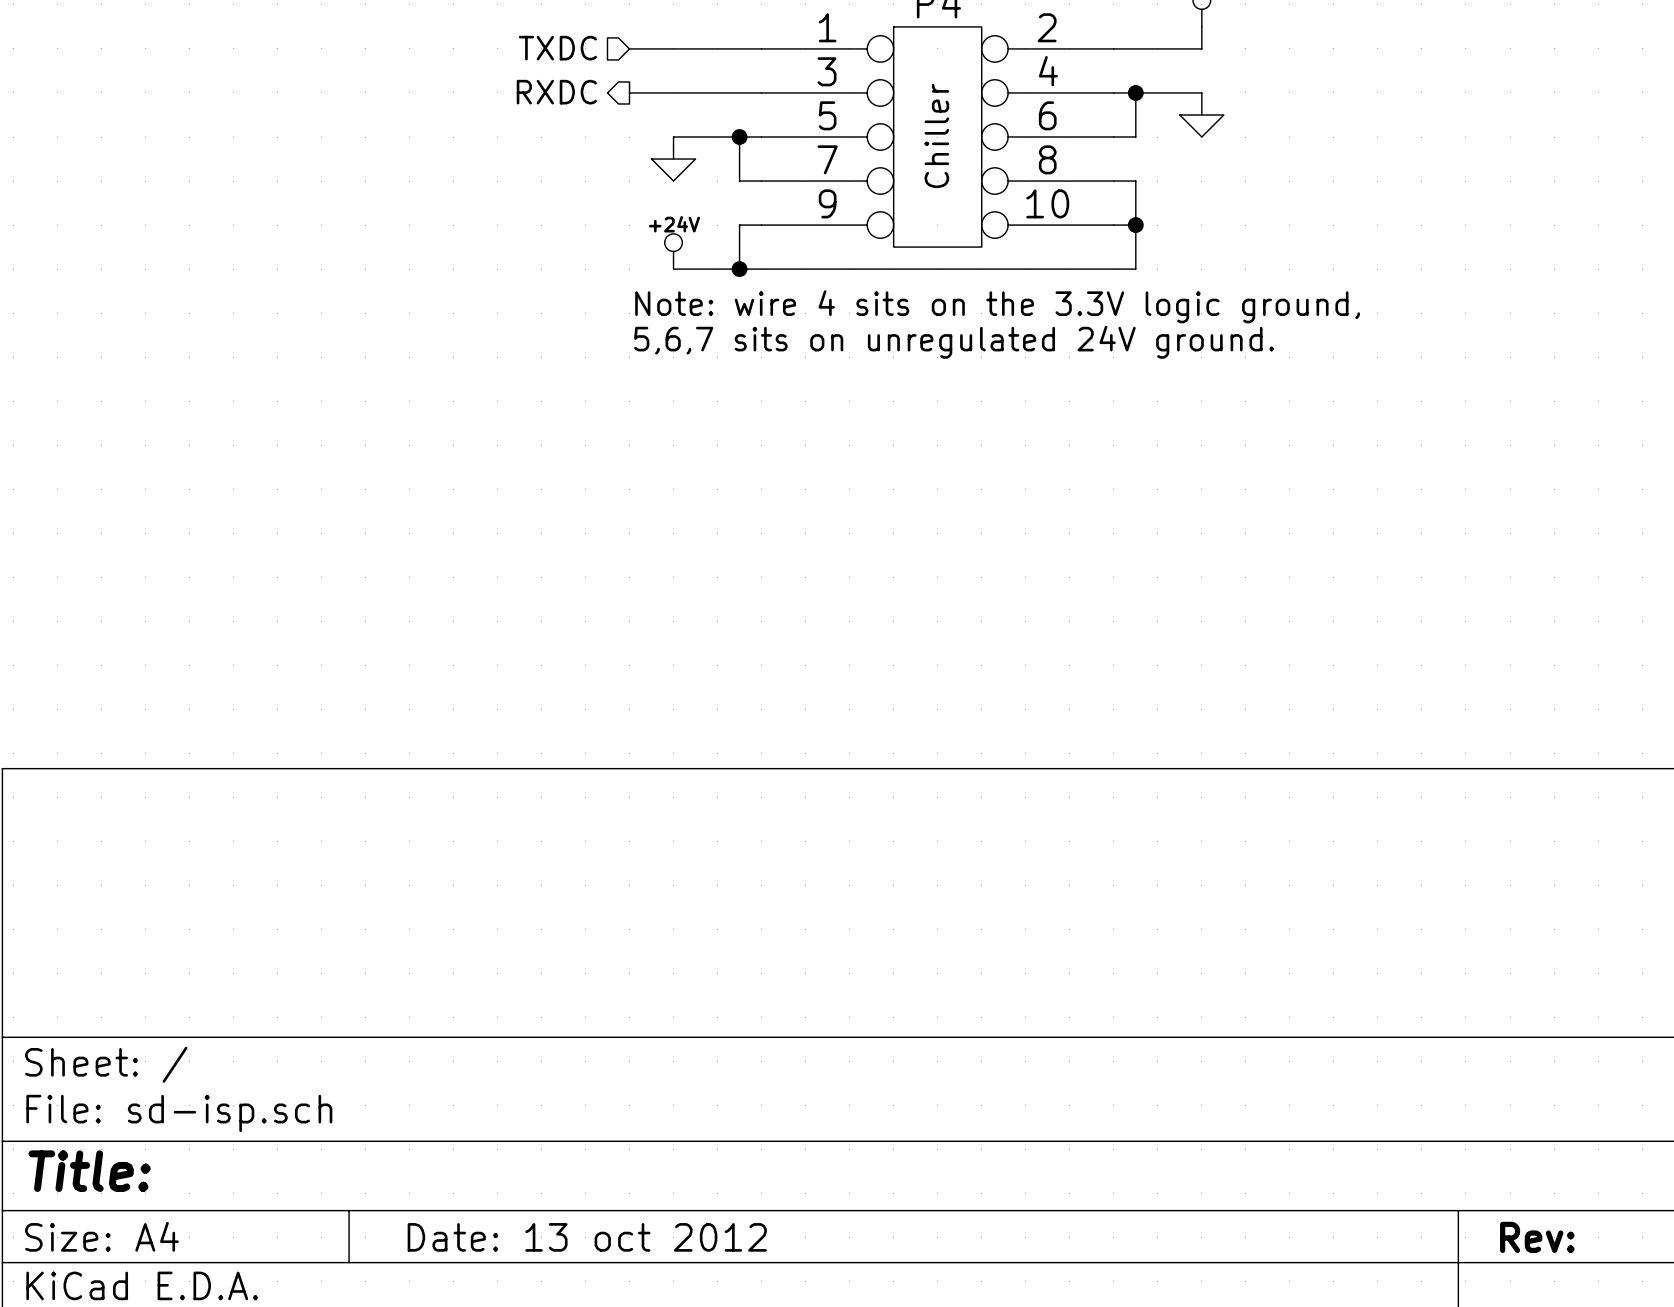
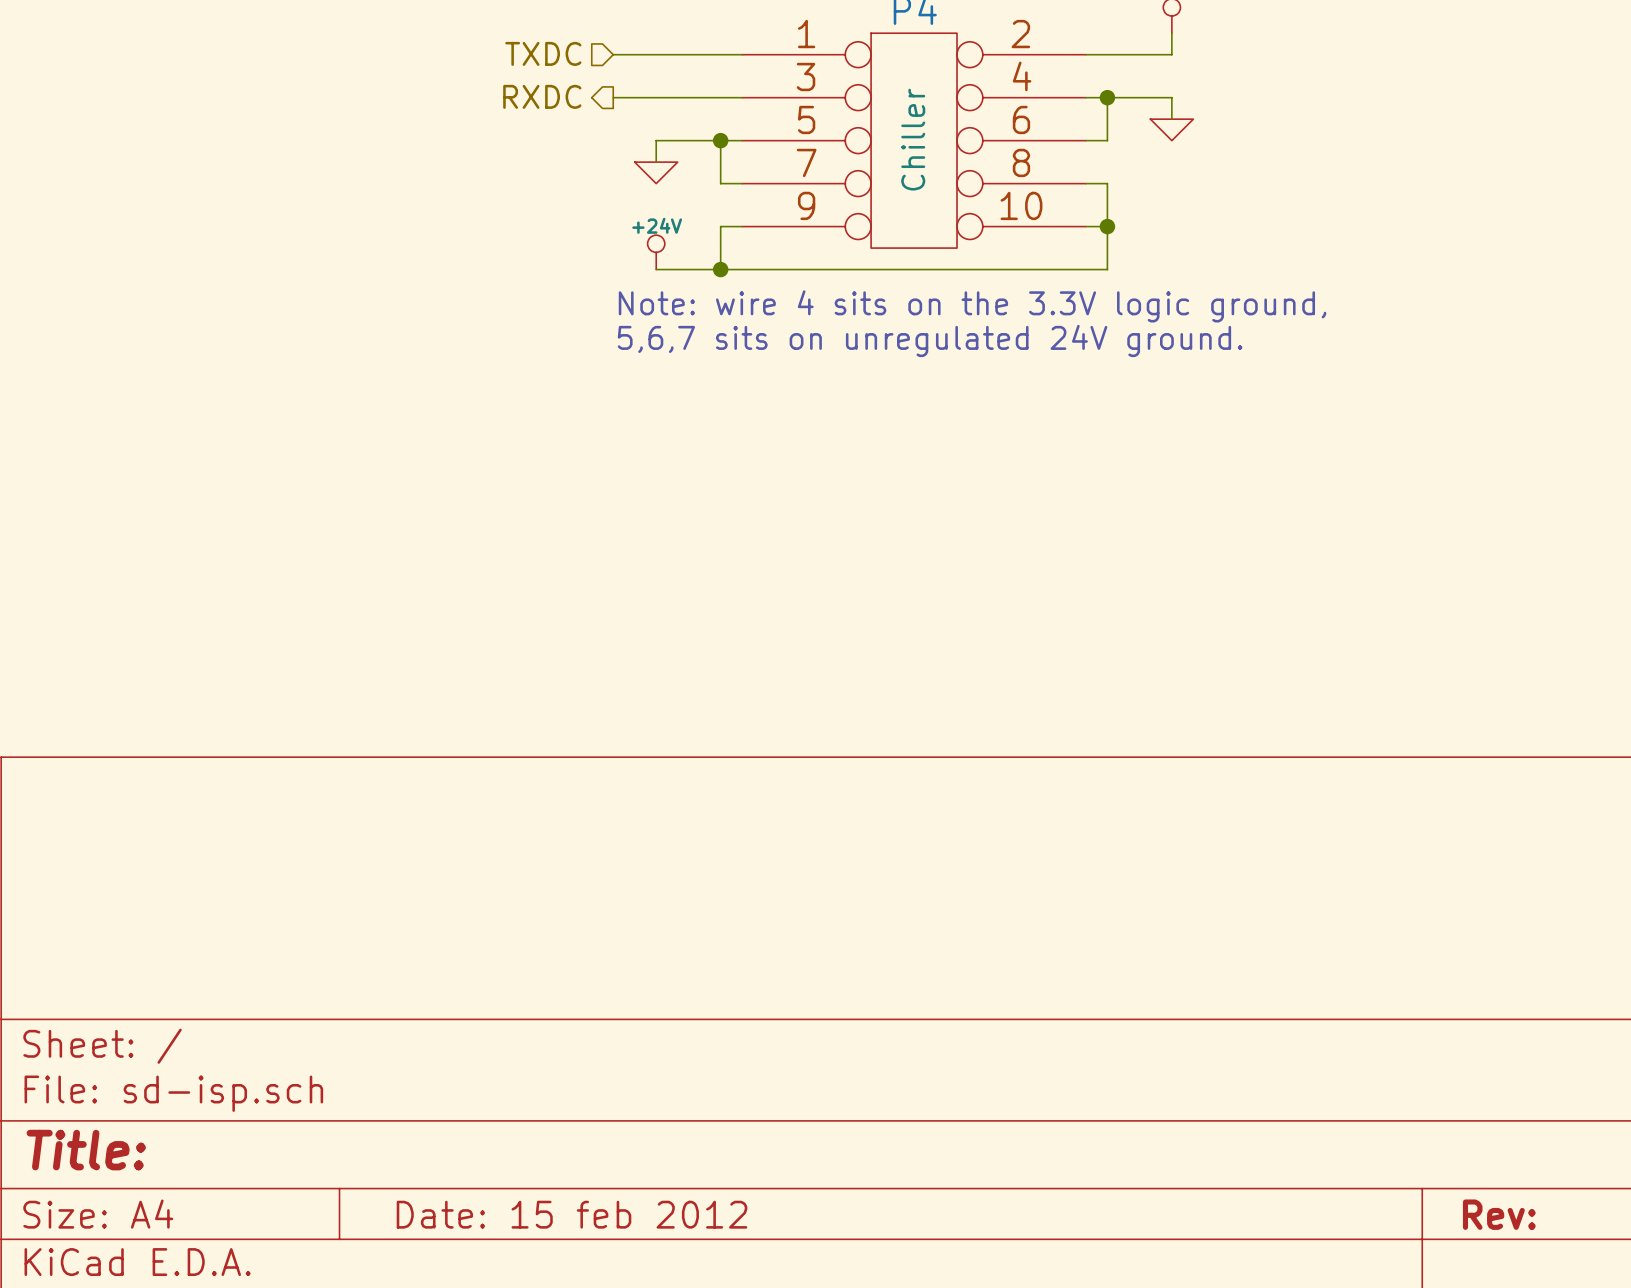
title block: Date: 13 oct 2012 (587, 1237) -> Date: 15 feb 2012 (572, 1214)

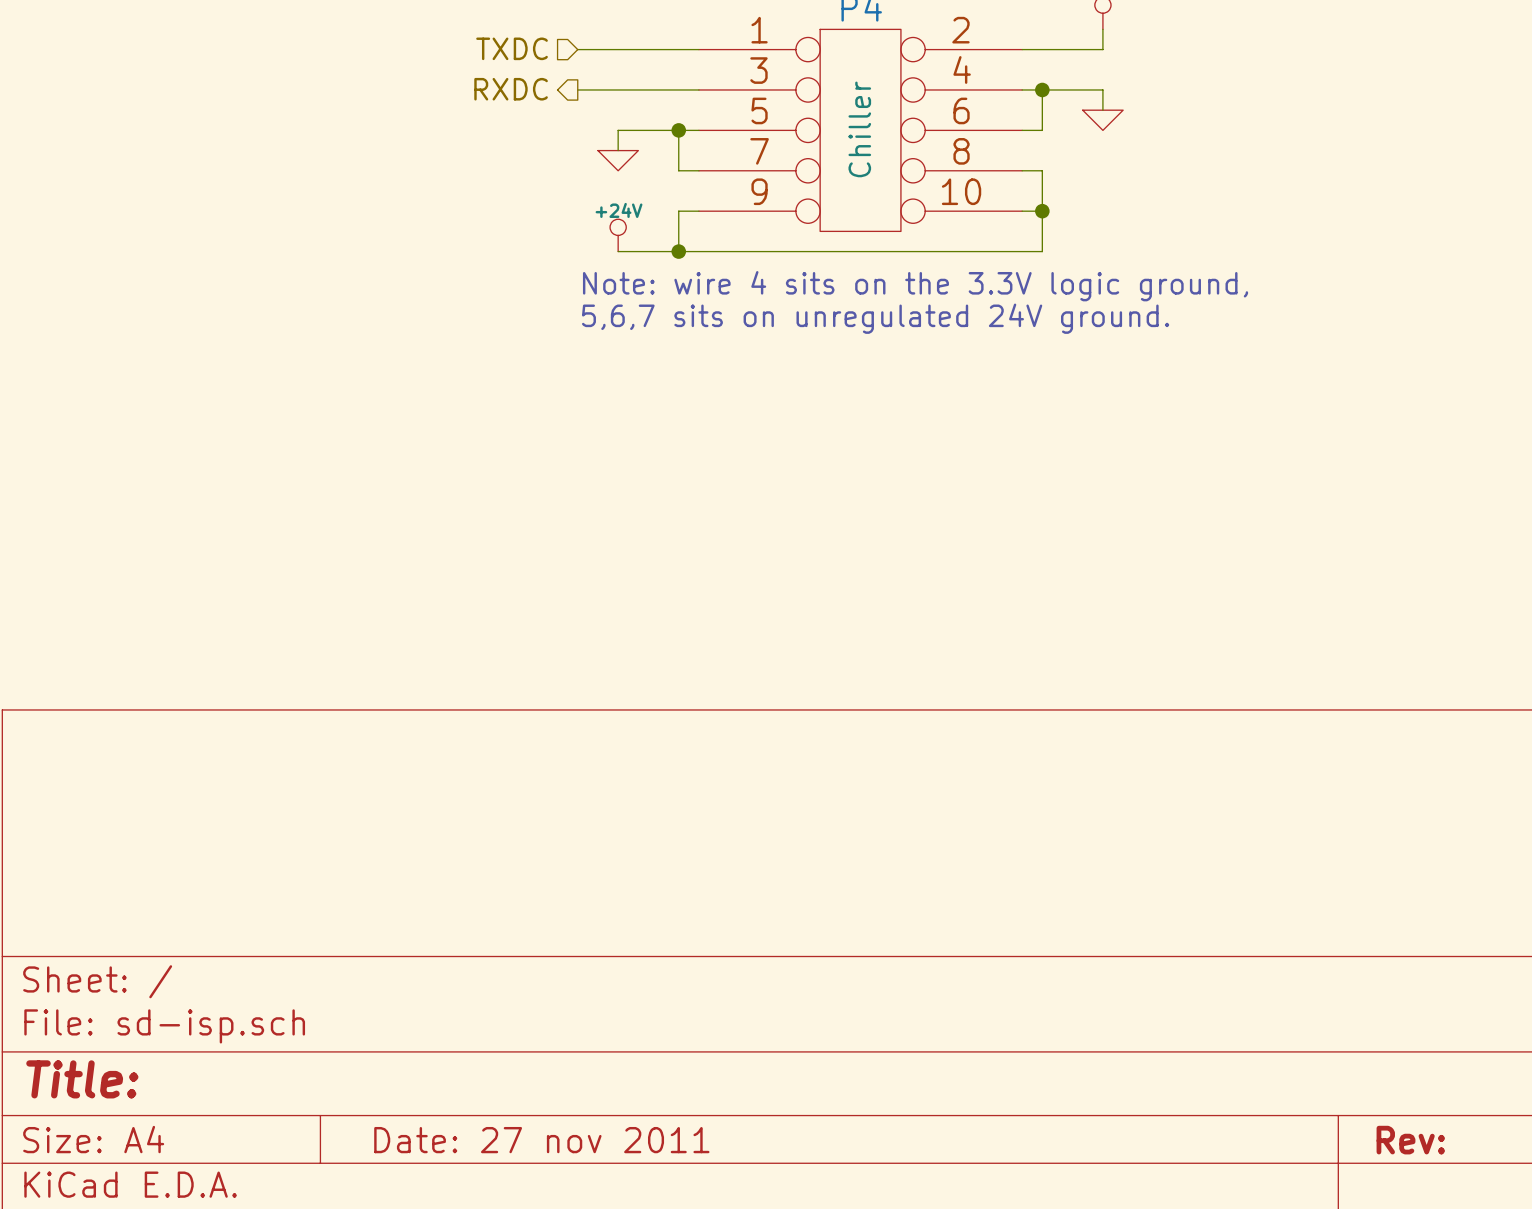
title block: Date: 15 feb 2012 (572, 1214) -> Date: 27 nov 2011 (541, 1140)

